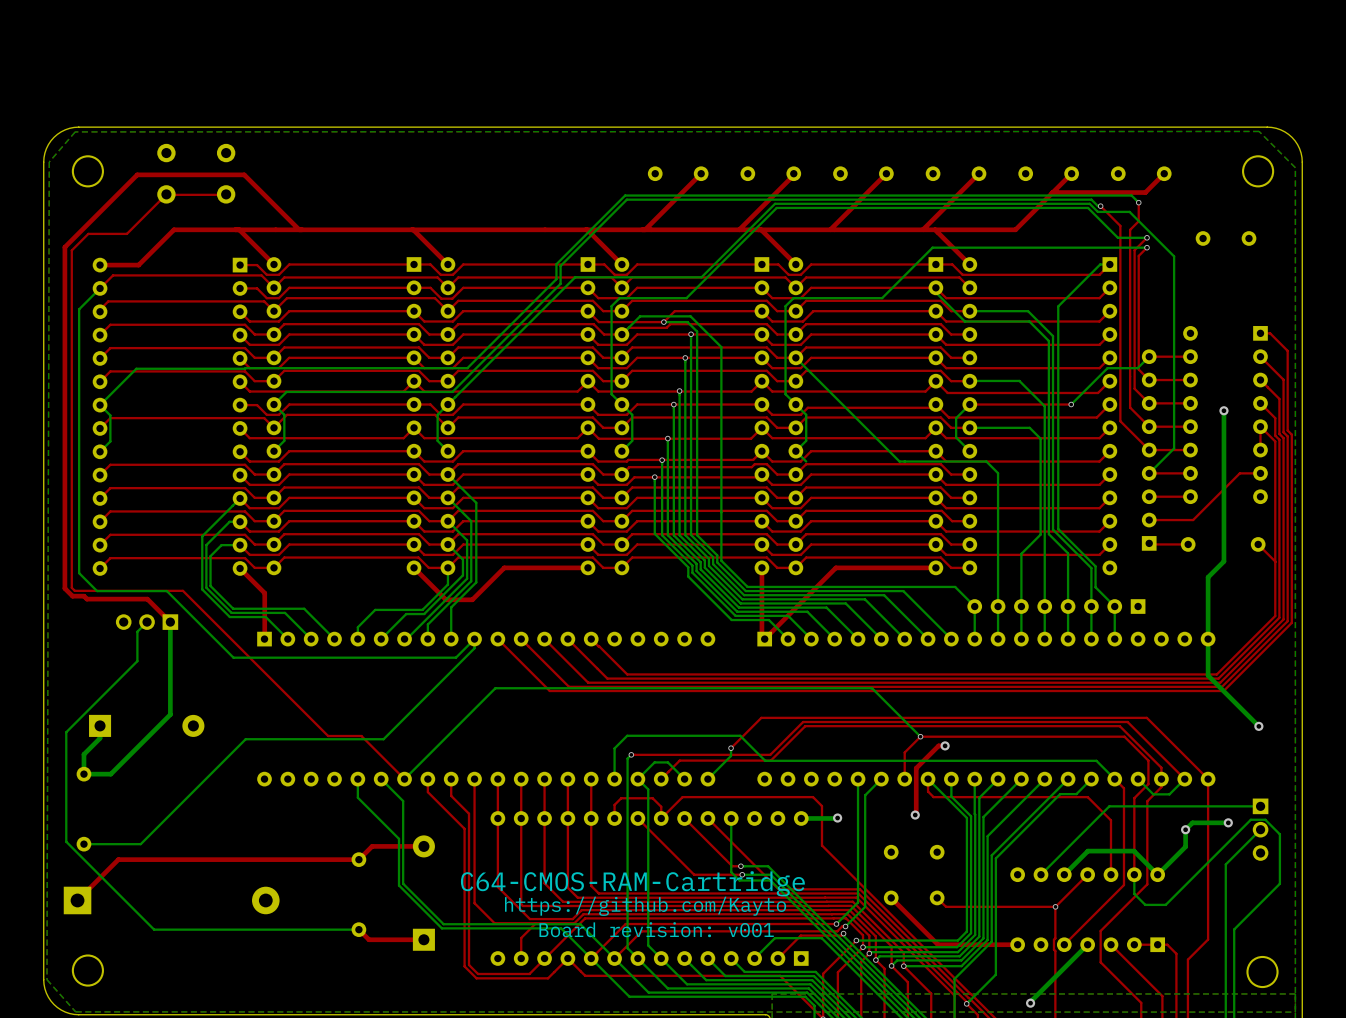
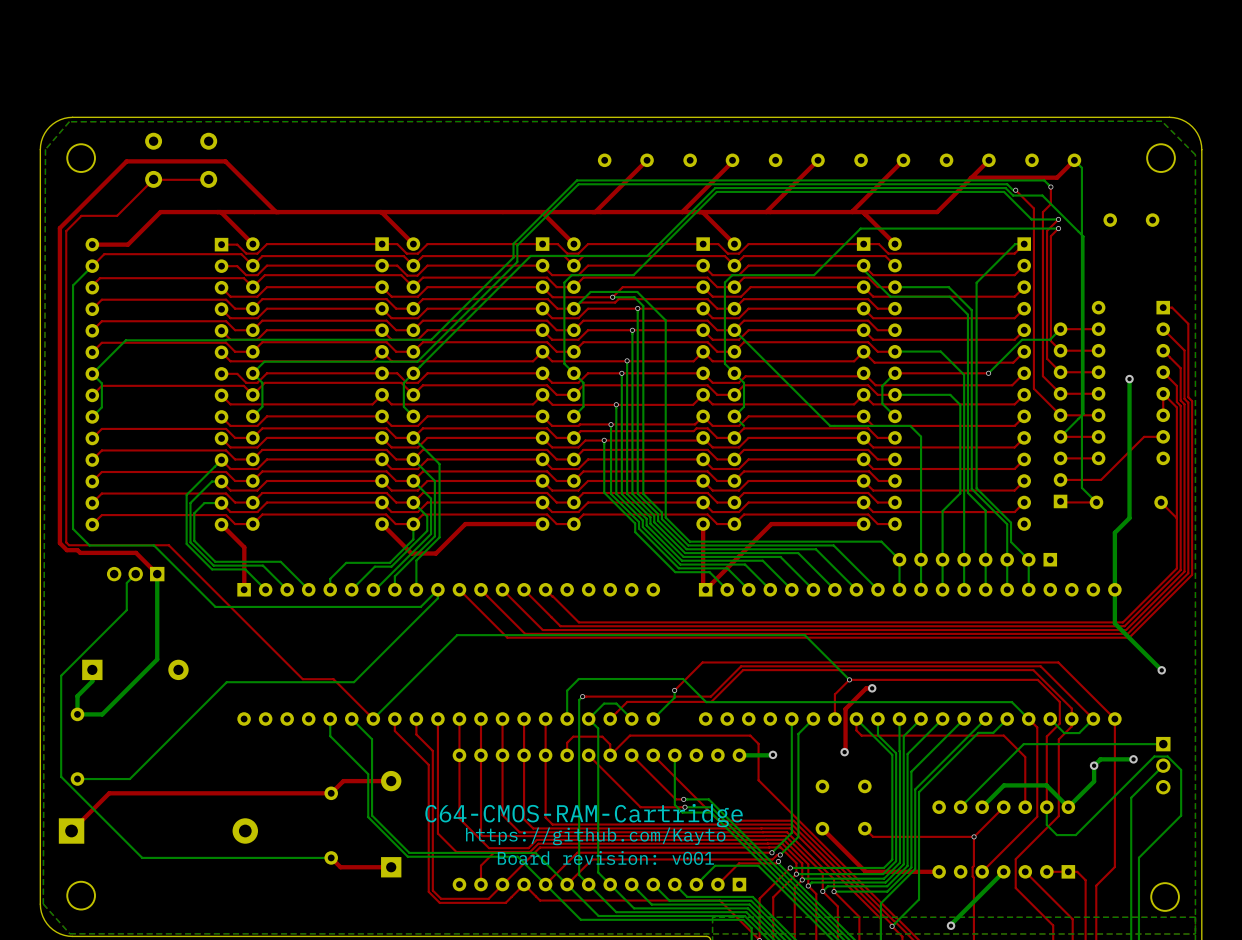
bottom track: none -> (1074, 160) (1081, 167) (1081, 487) (1096, 502)

